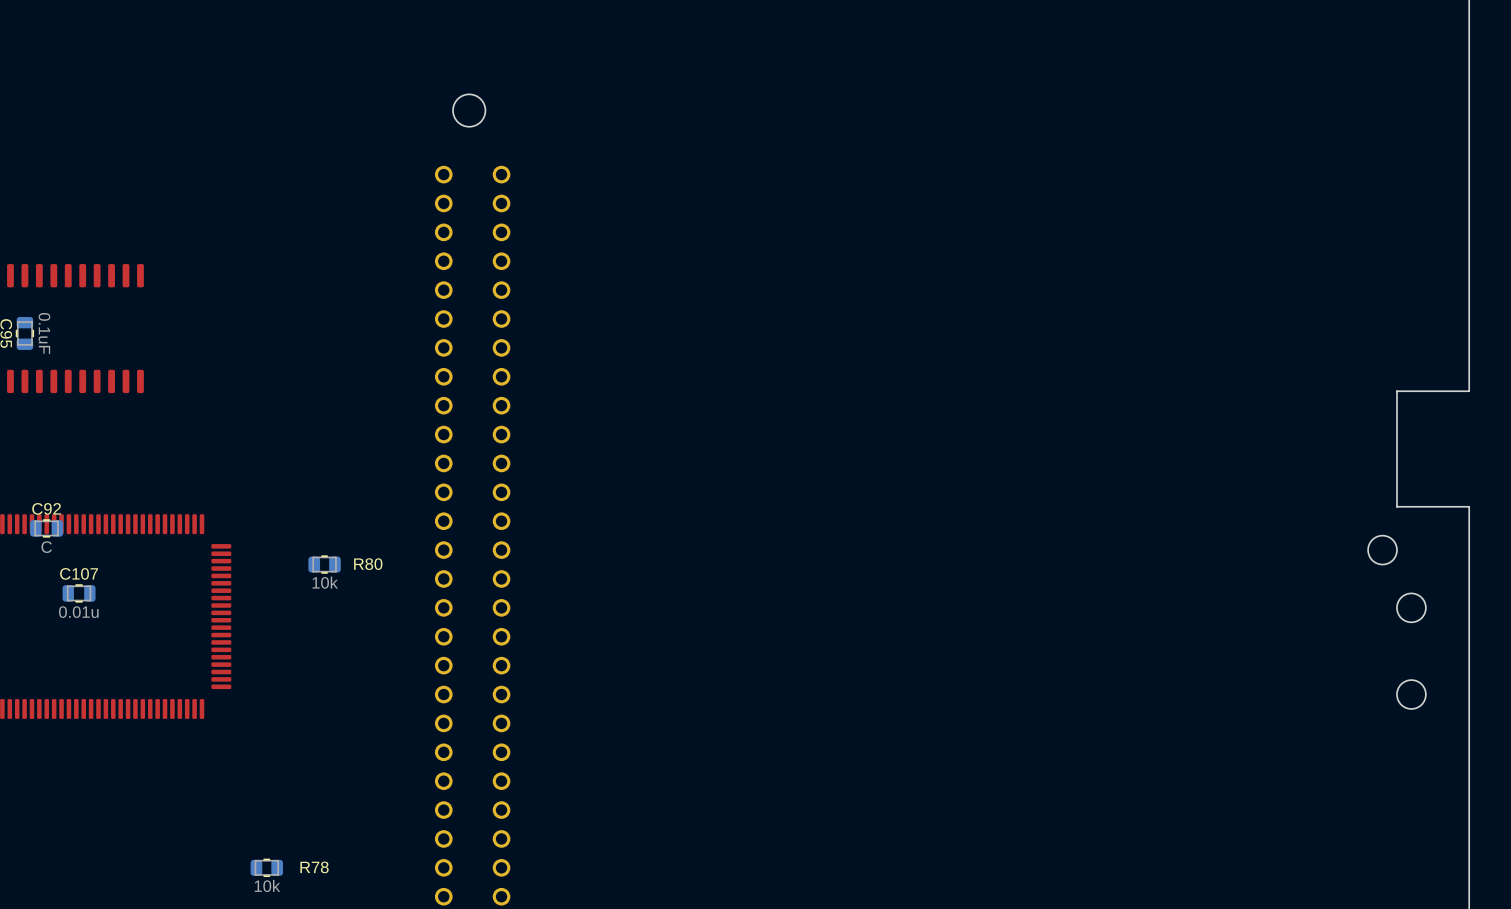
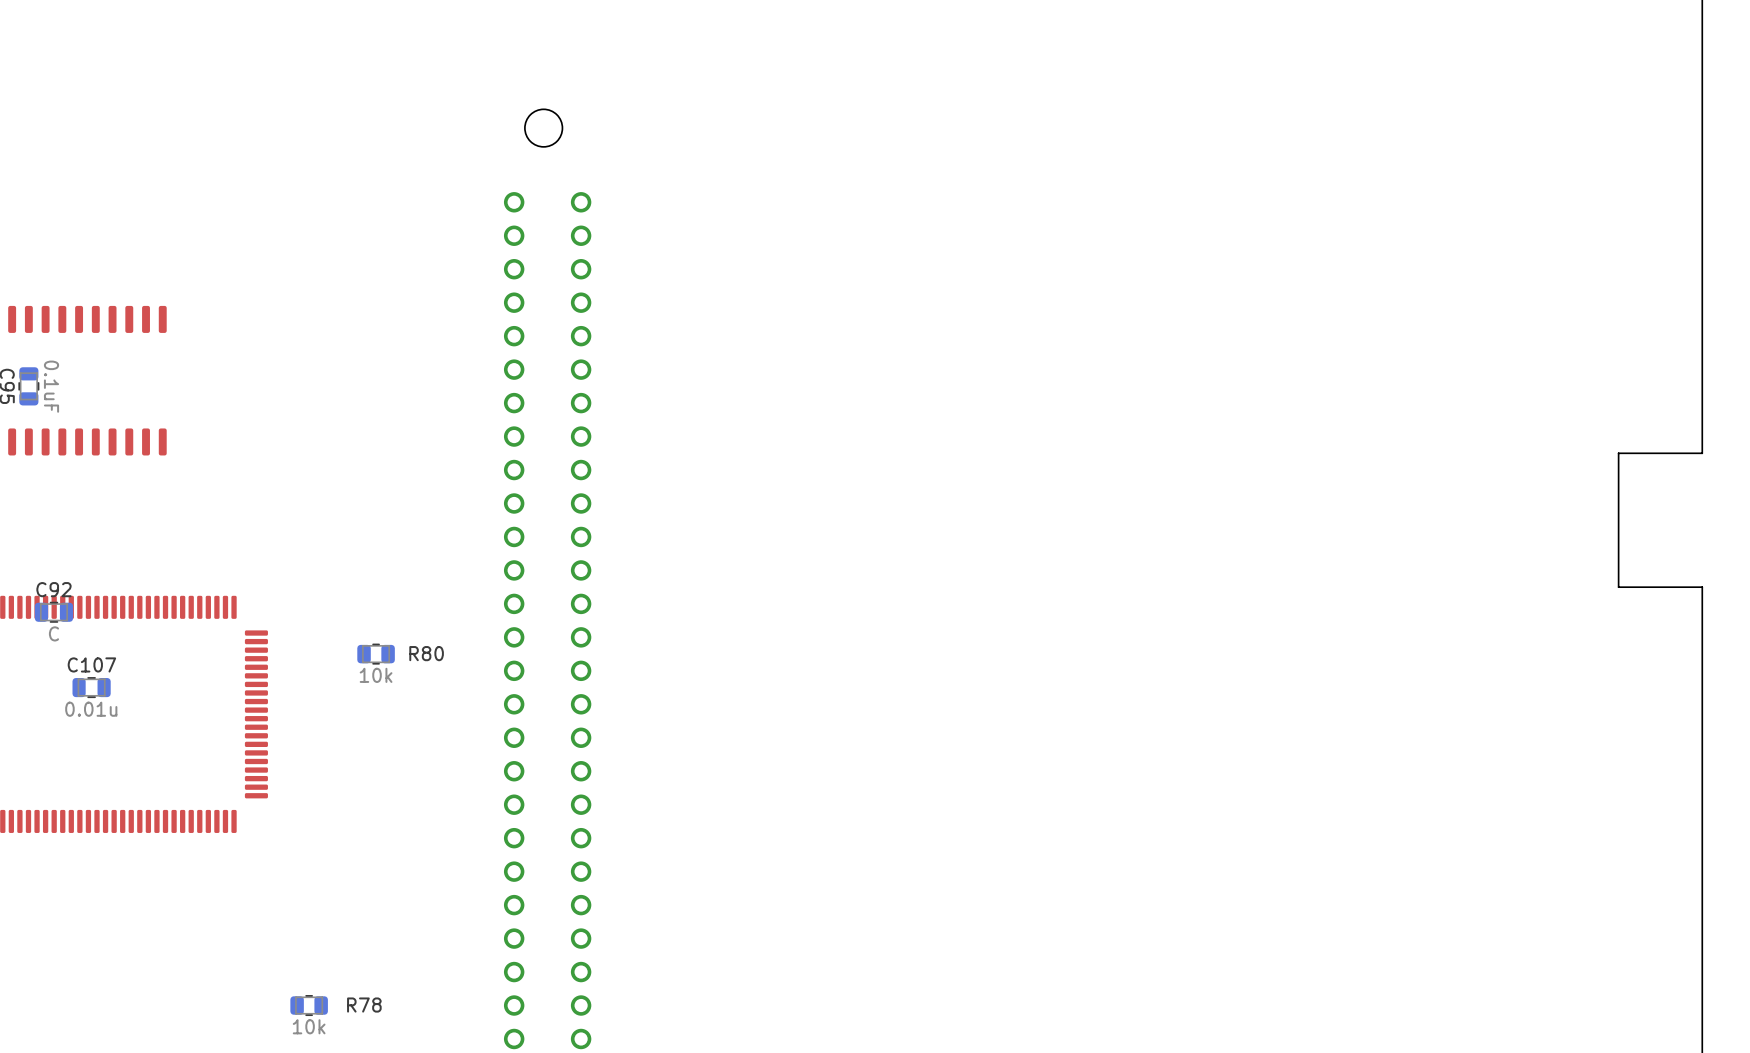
round board edge: [1367, 535, 1398, 566] -> none
round board edge: [1396, 592, 1427, 623] -> none
round board edge: [1396, 679, 1427, 710] -> none

